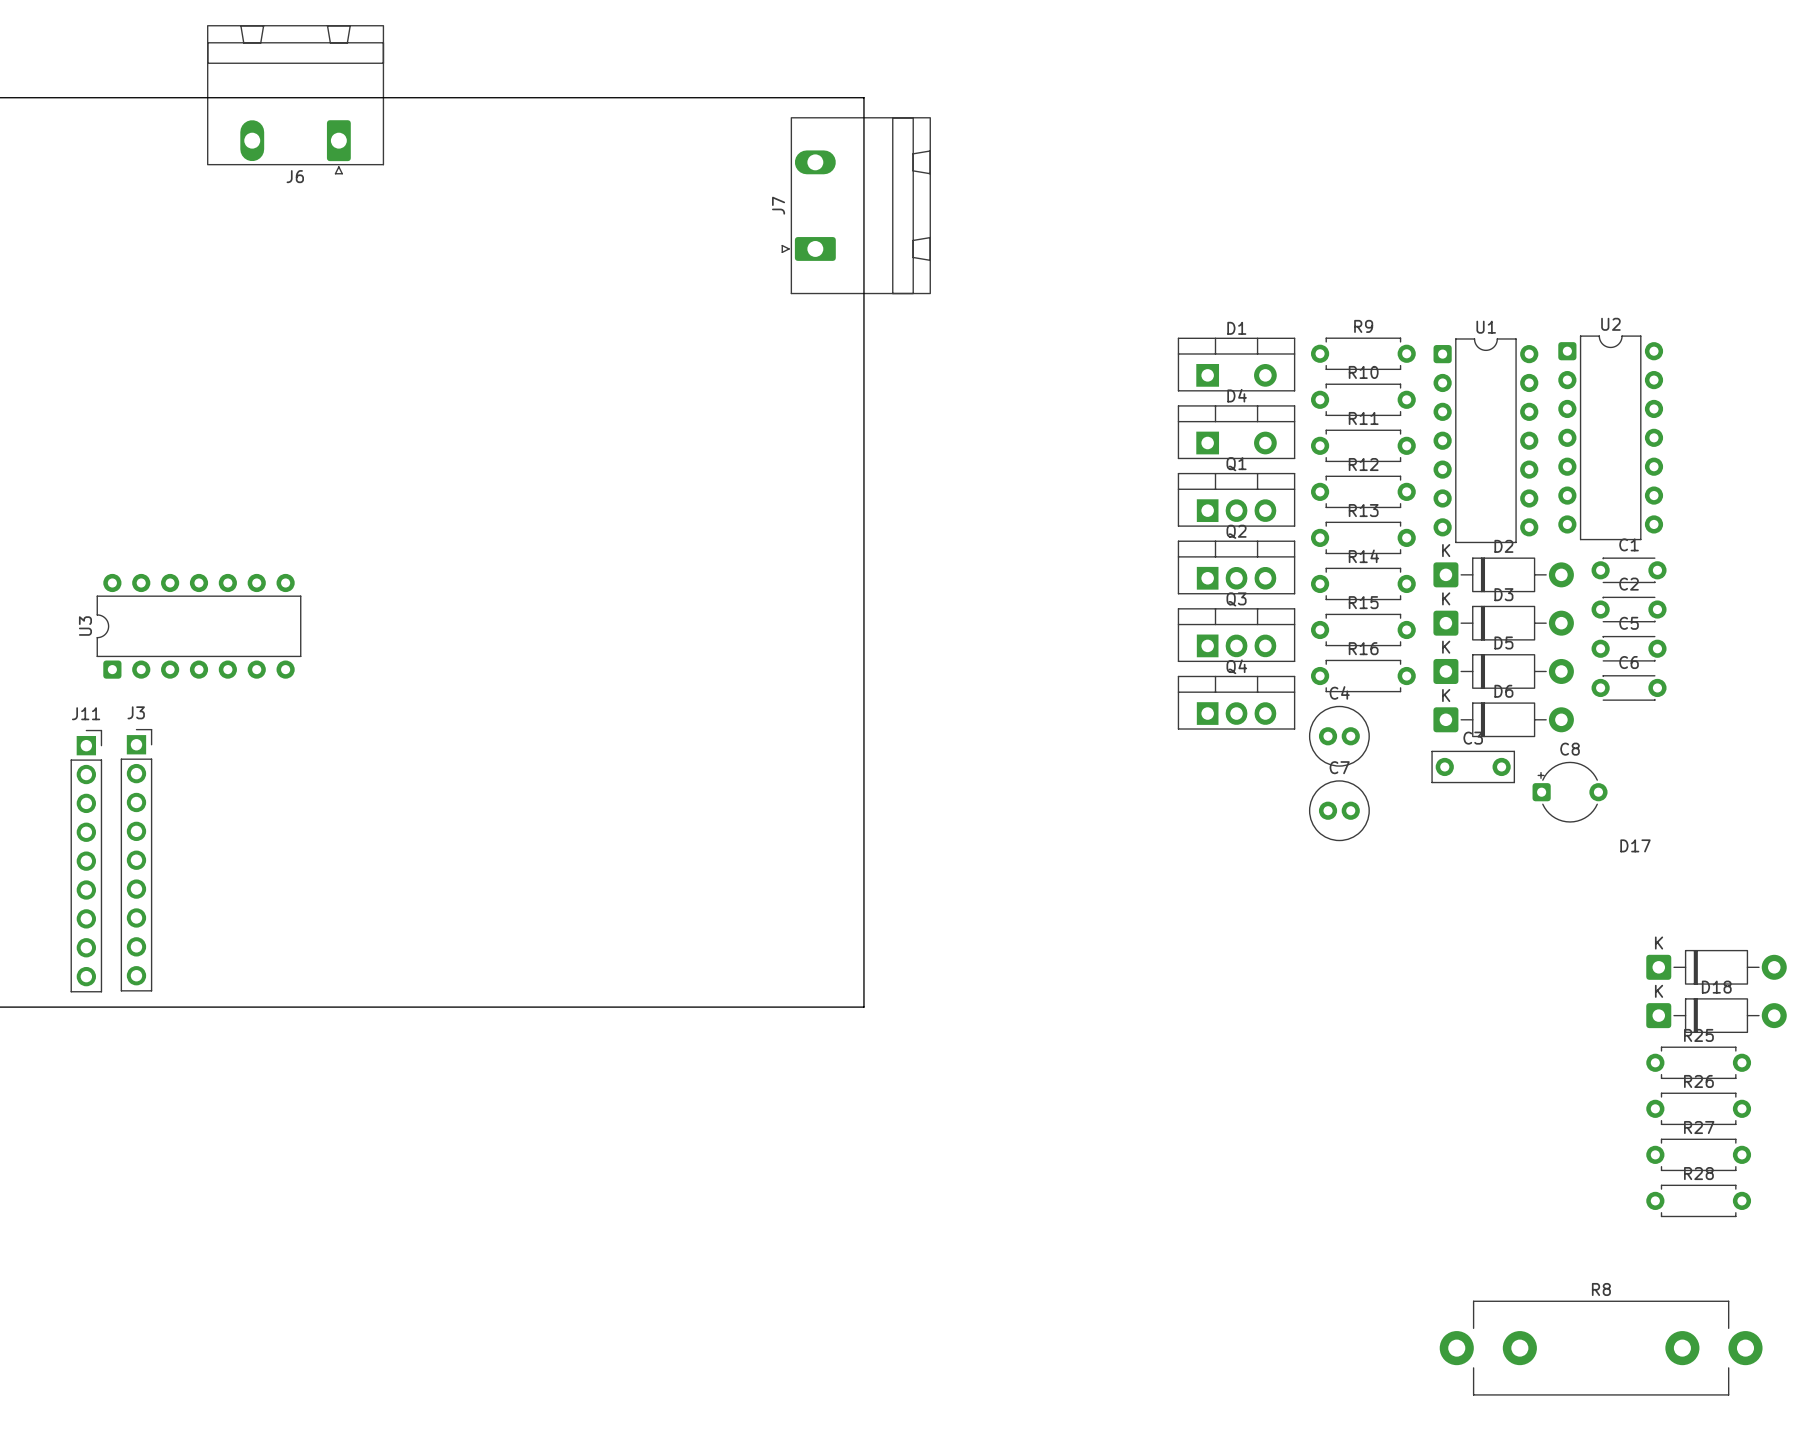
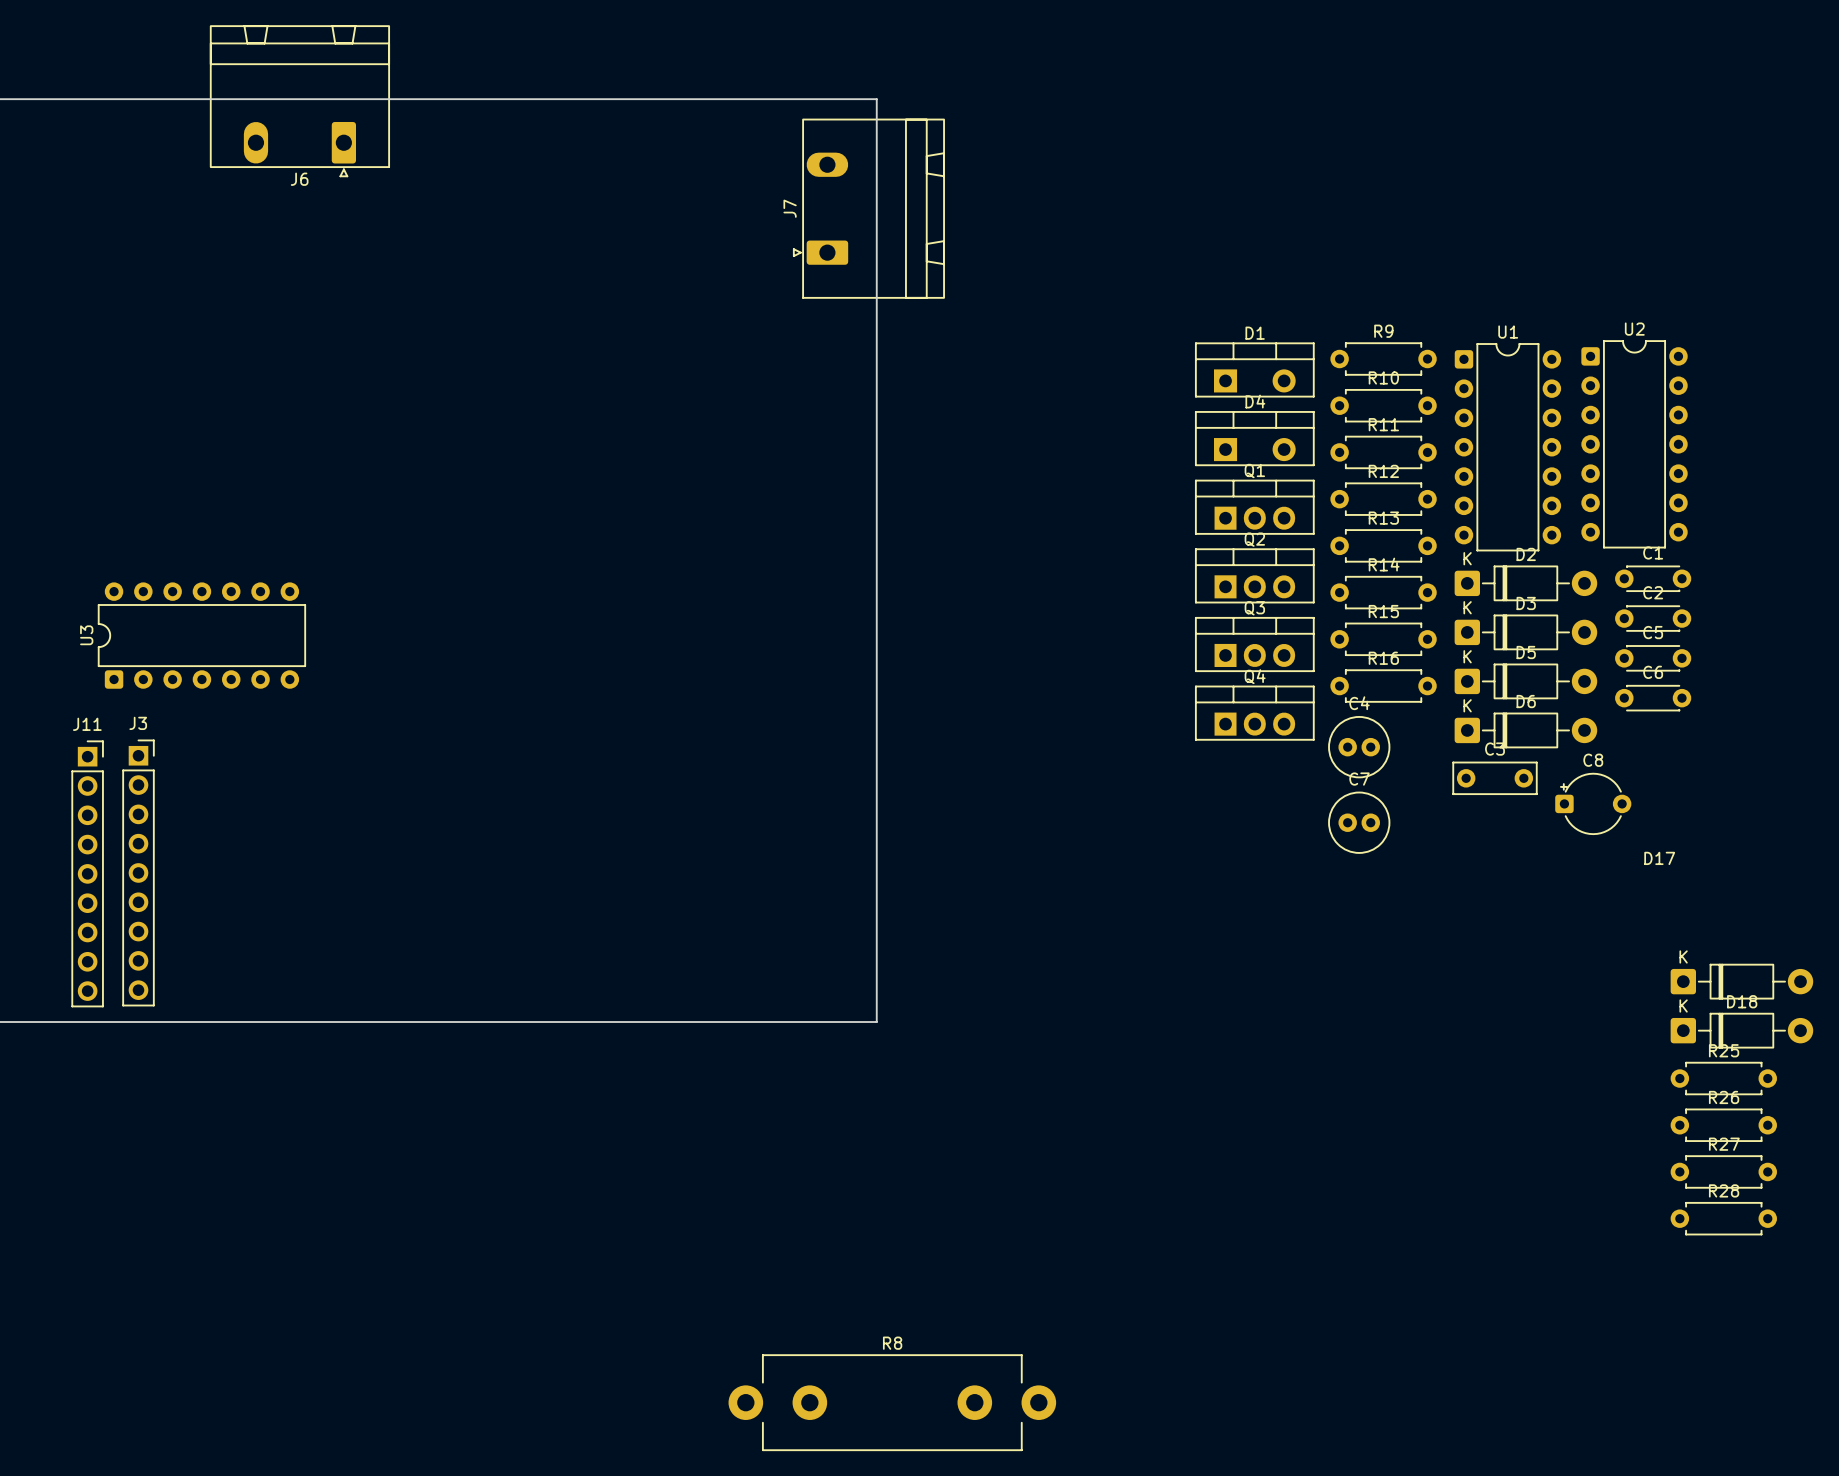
R8 position: (1601, 1348) -> (892, 1402)

